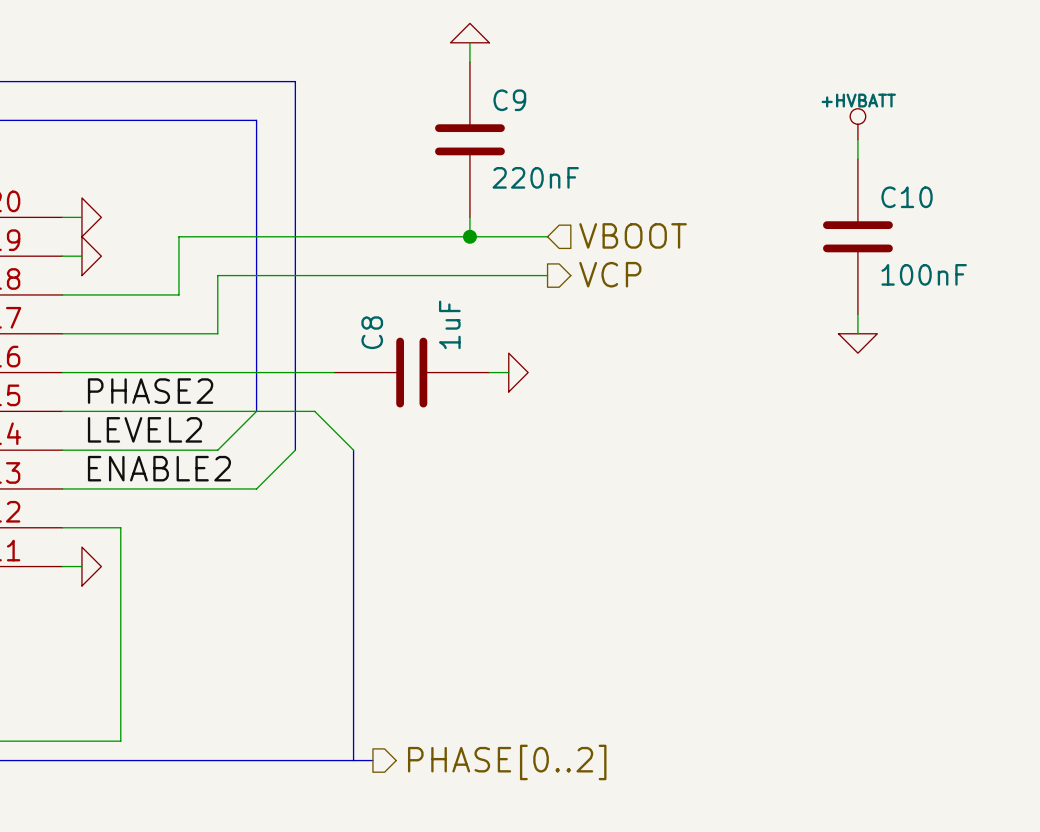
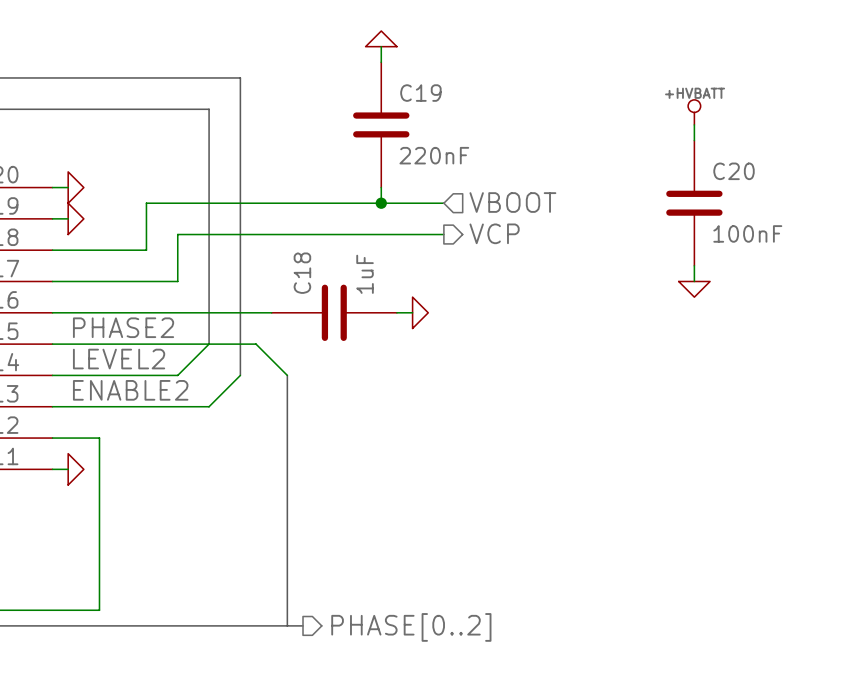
C9 name: C9 (509, 100) -> C19 (420, 93)
C10 name: C10 (907, 197) -> C20 (734, 171)
C8 name: C8 (372, 332) -> C18 (302, 273)

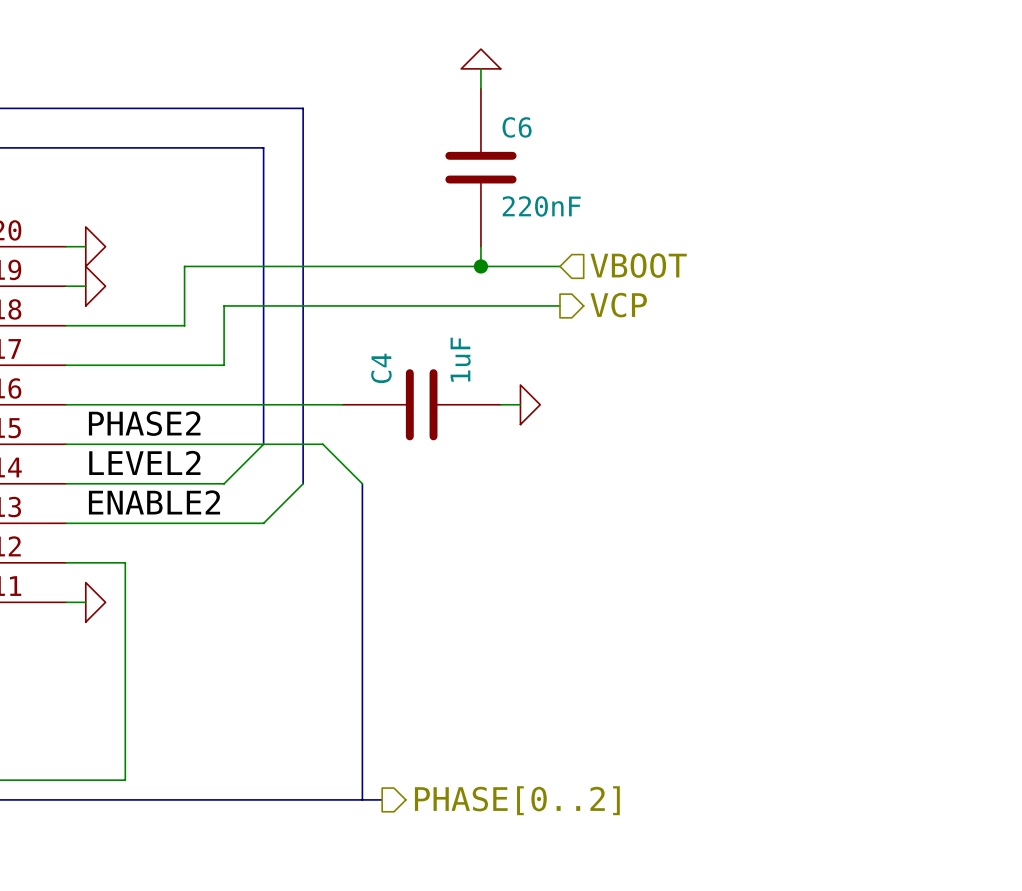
C19 name: C19 (420, 93) -> C6 (517, 127)
power symbol: +HVBATT (694, 112) -> none
wire: (694, 124) (694, 140) -> none
C20: 100nF (694, 203) -> none
wire: (694, 265) (694, 281) -> none
C18 name: C18 (302, 273) -> C4 (381, 368)
power symbol: (694, 289) -> none

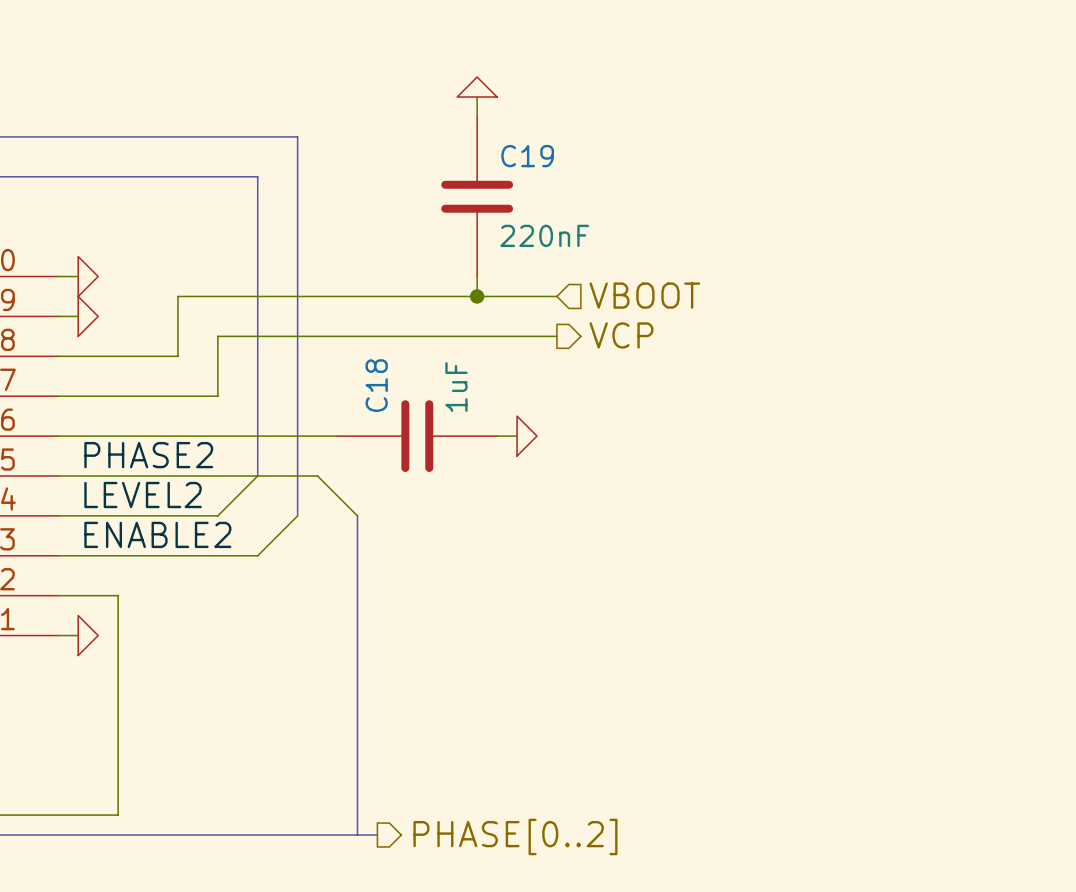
C6 name: C6 (517, 127) -> C19 (527, 156)
C4 name: C4 (381, 368) -> C18 (376, 385)

